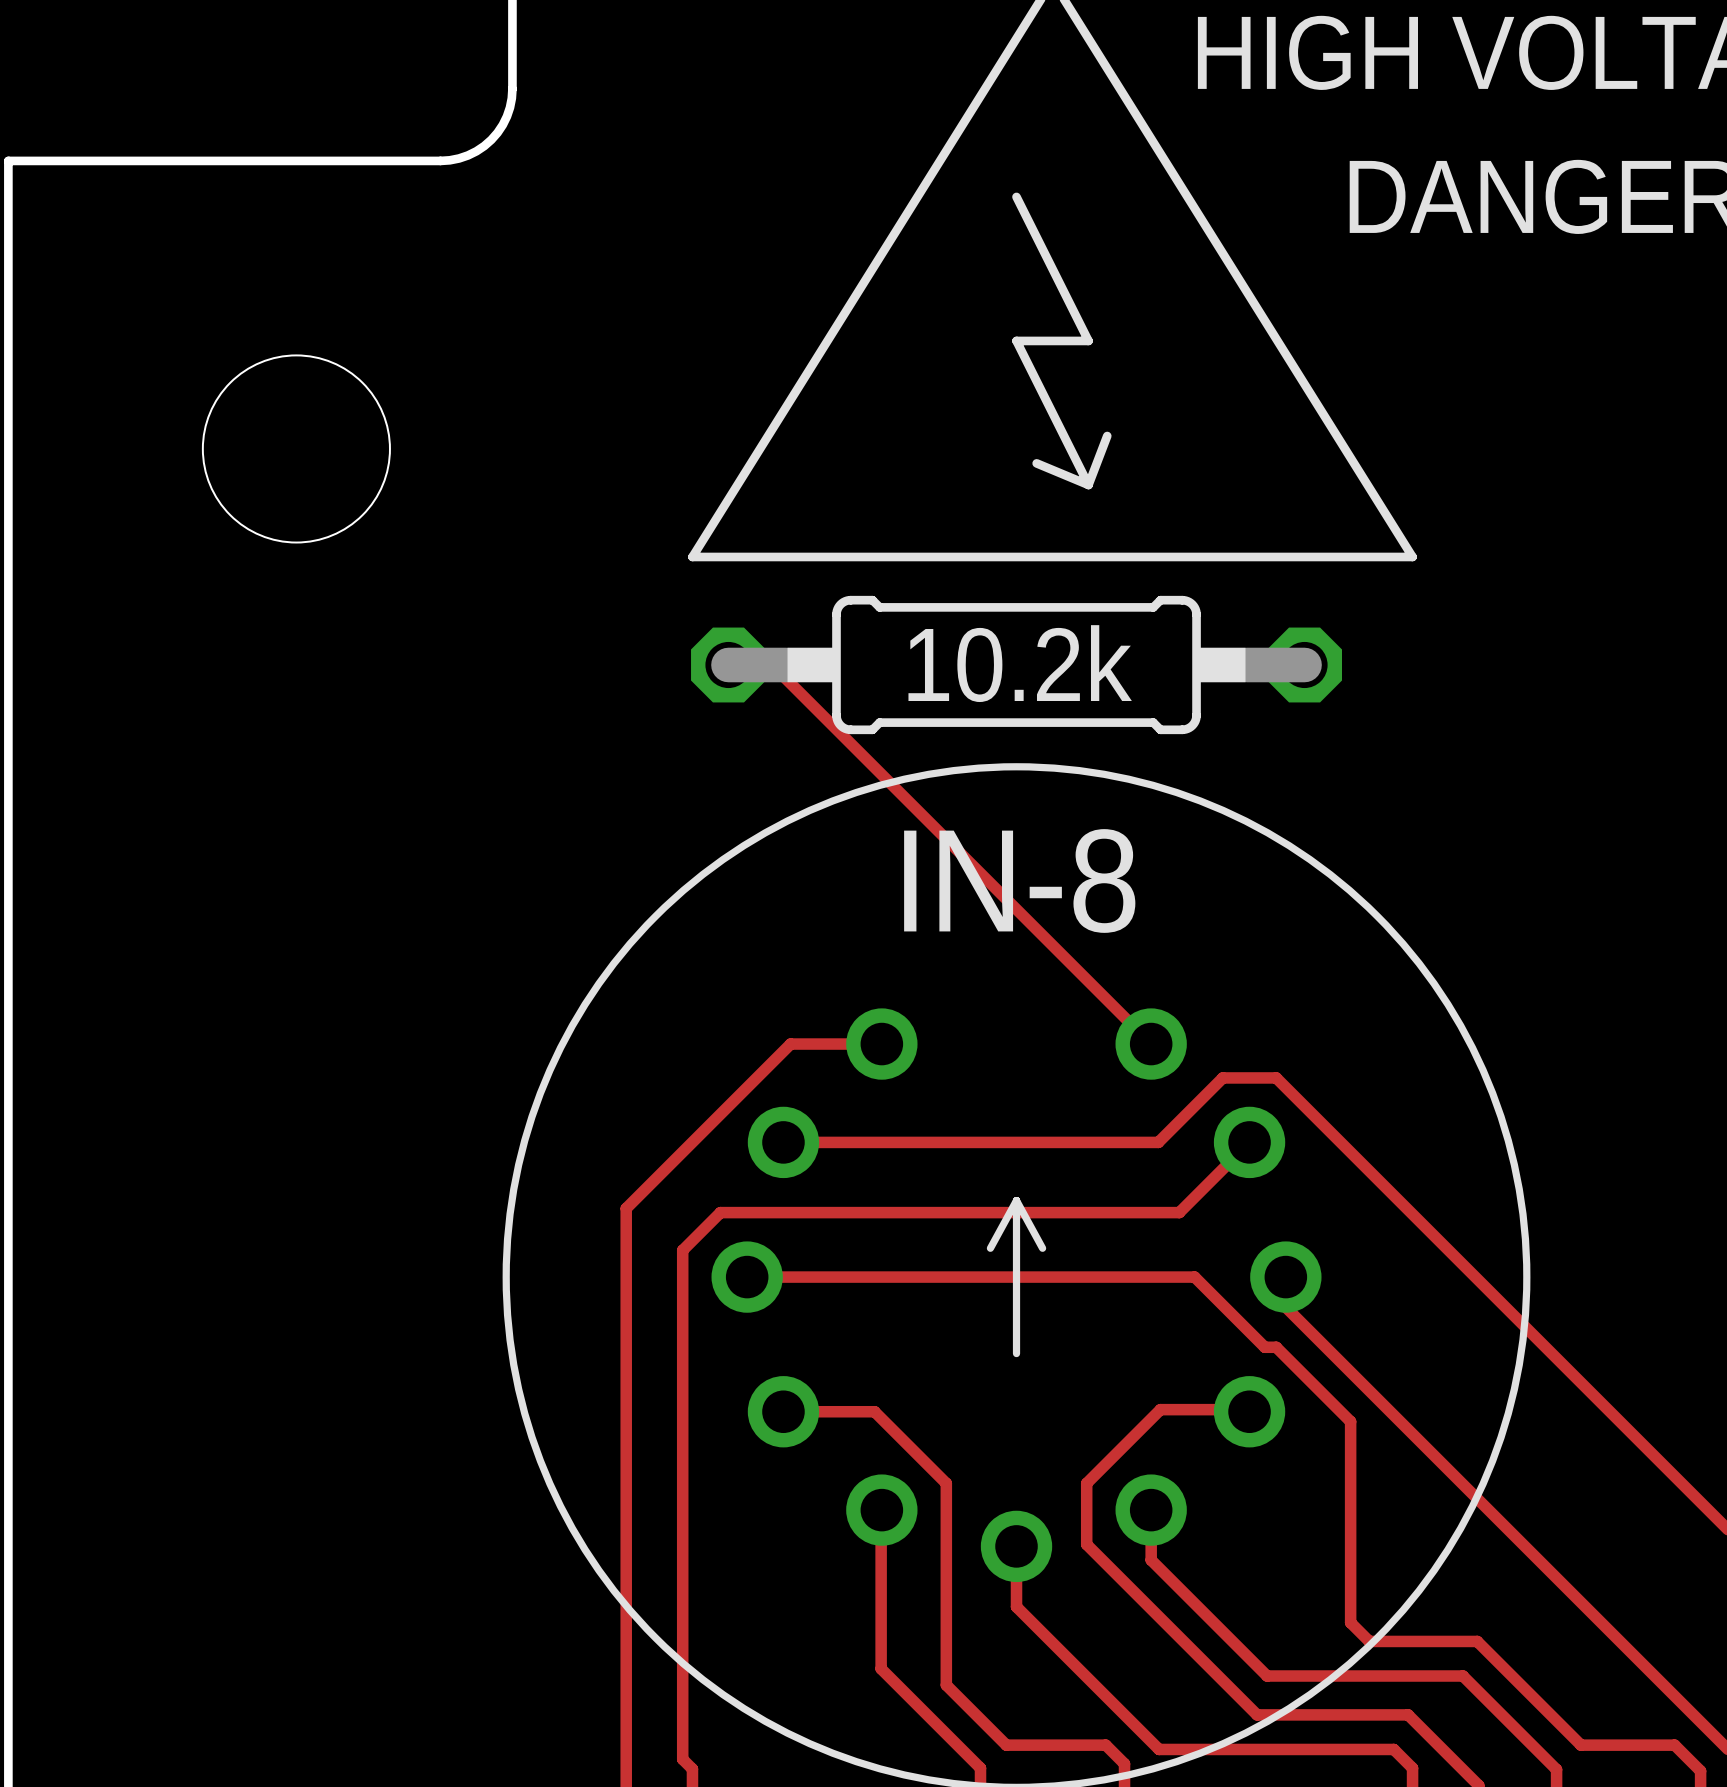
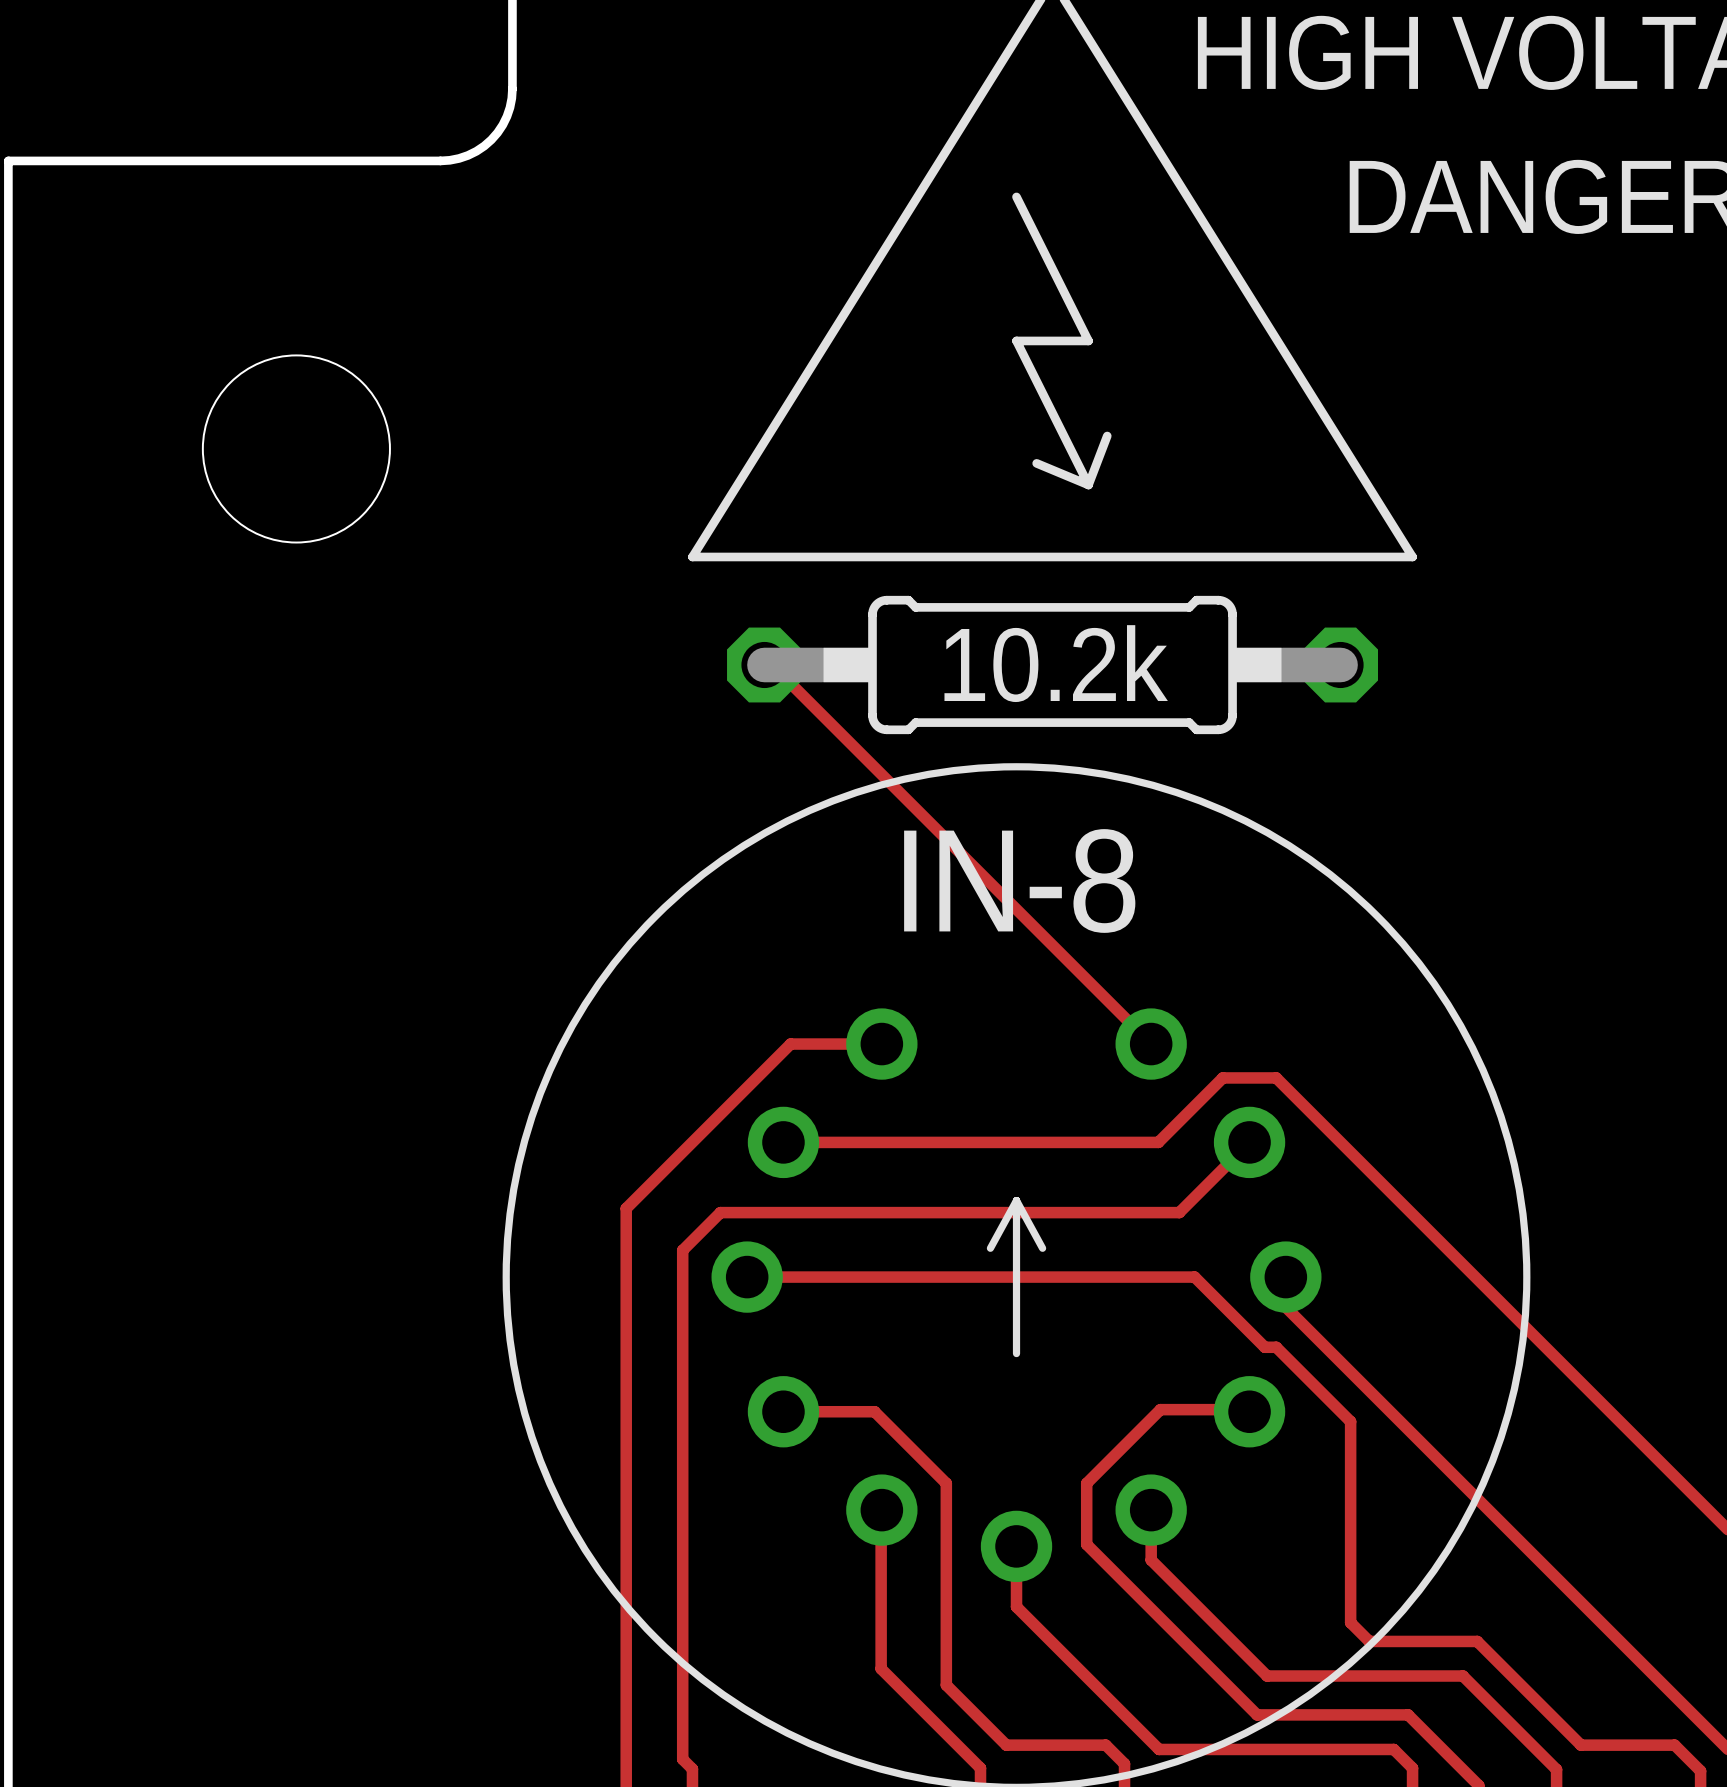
part position: (1016, 664) -> (1052, 664)

